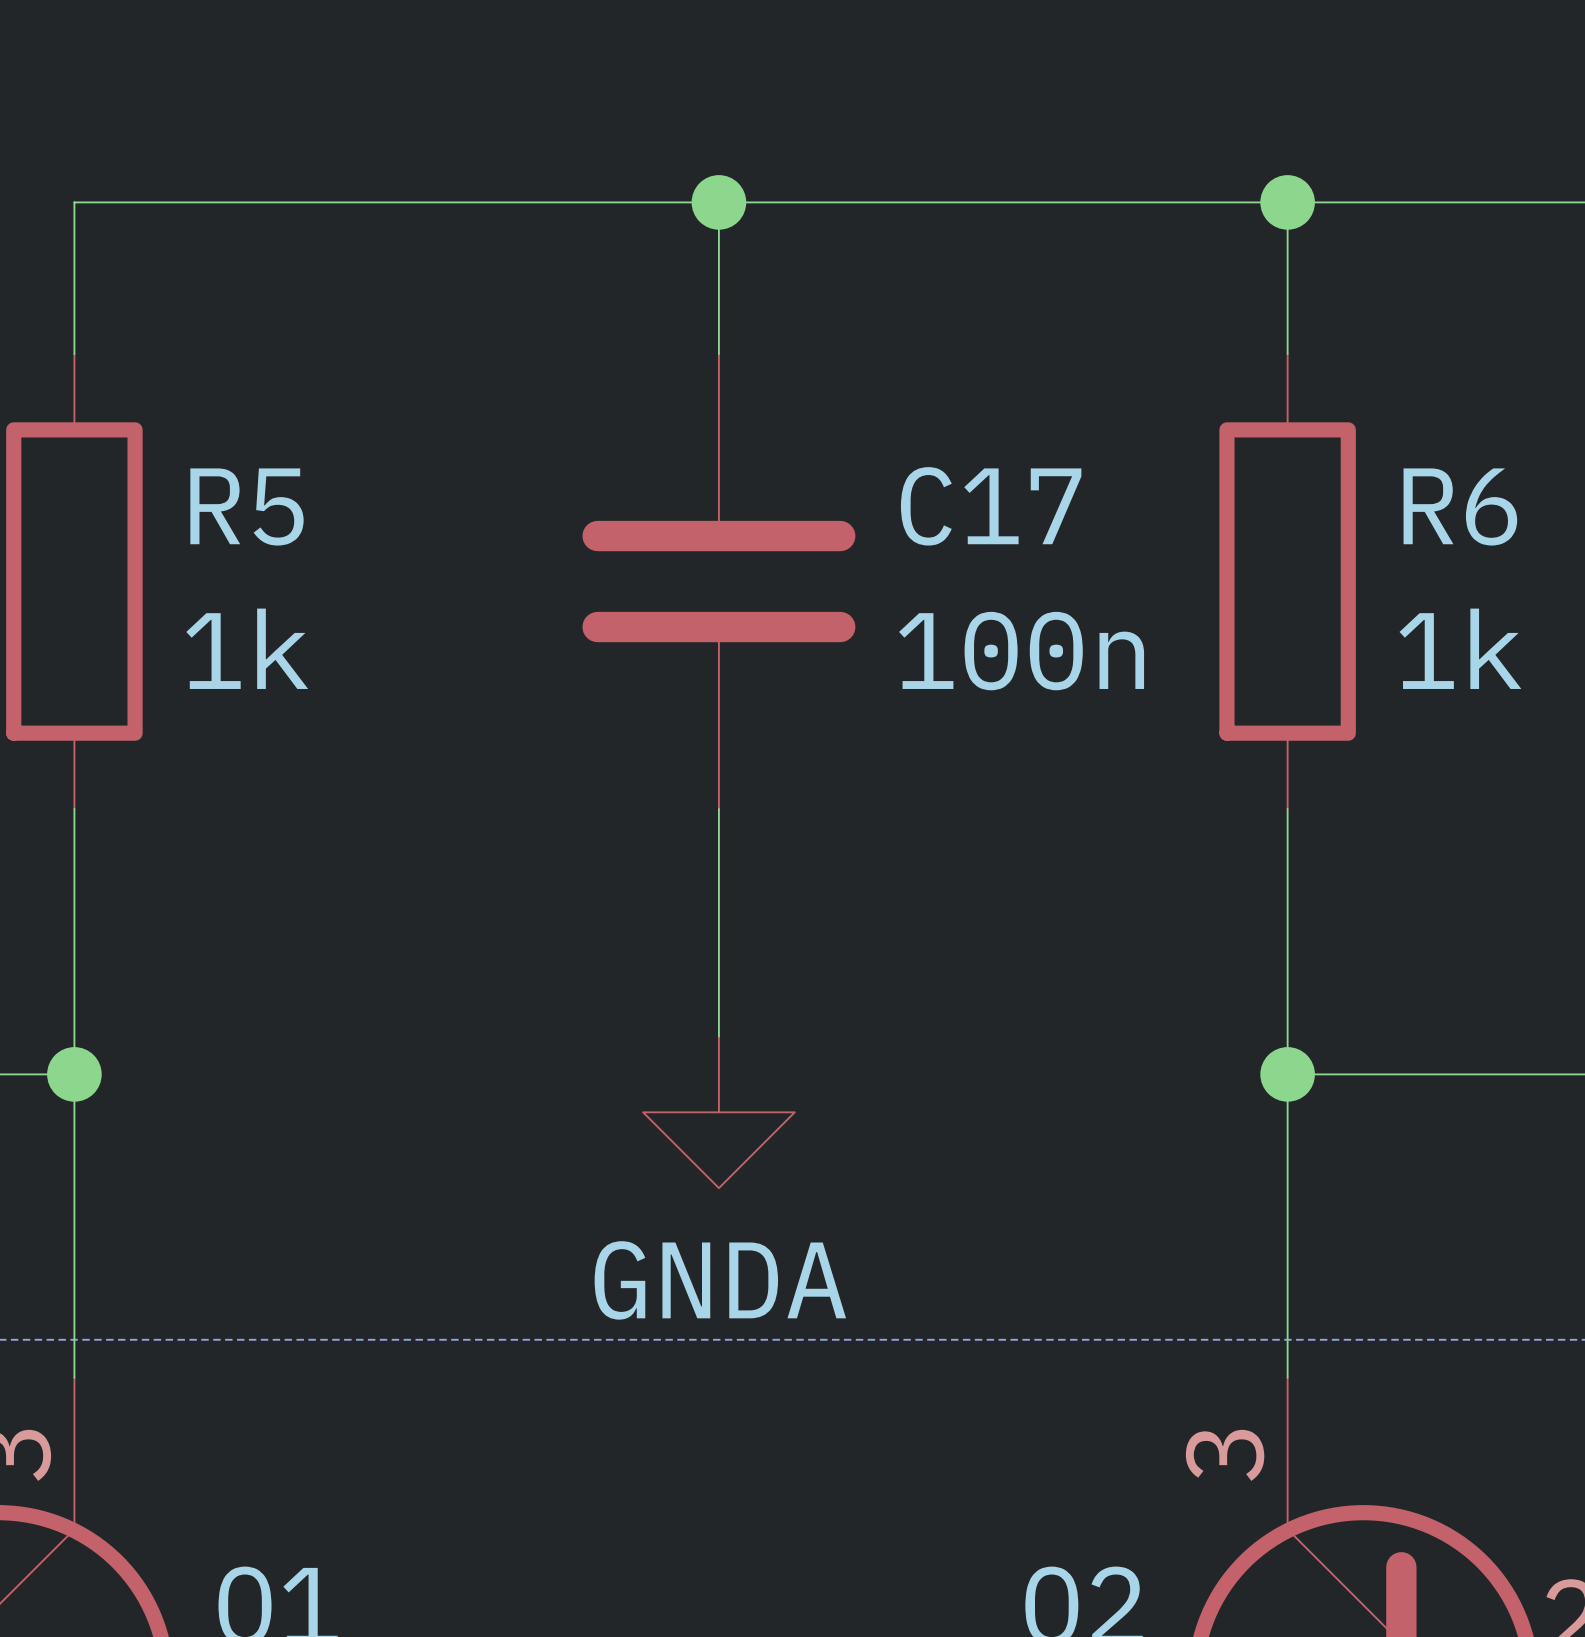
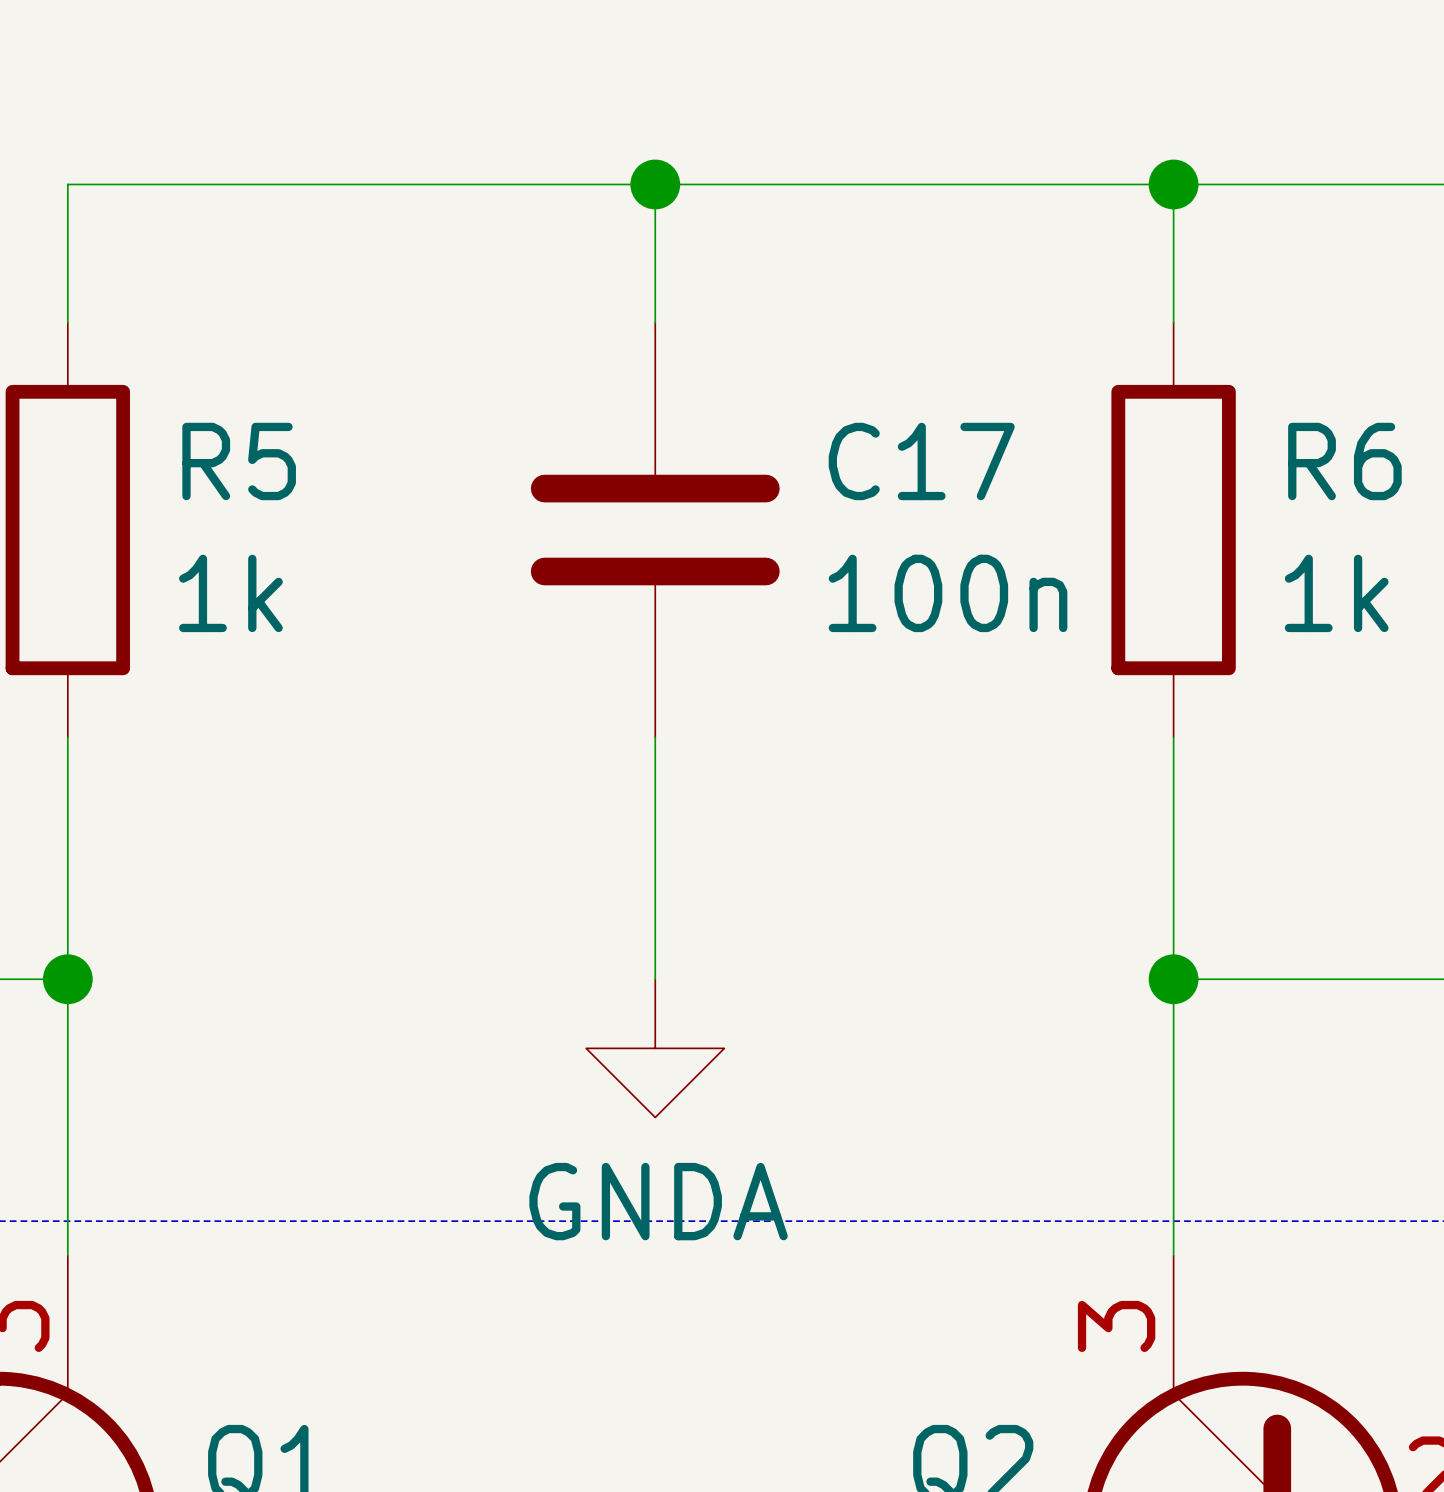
power symbol position: GNDA (718, 1112) -> GNDA (655, 1048)

